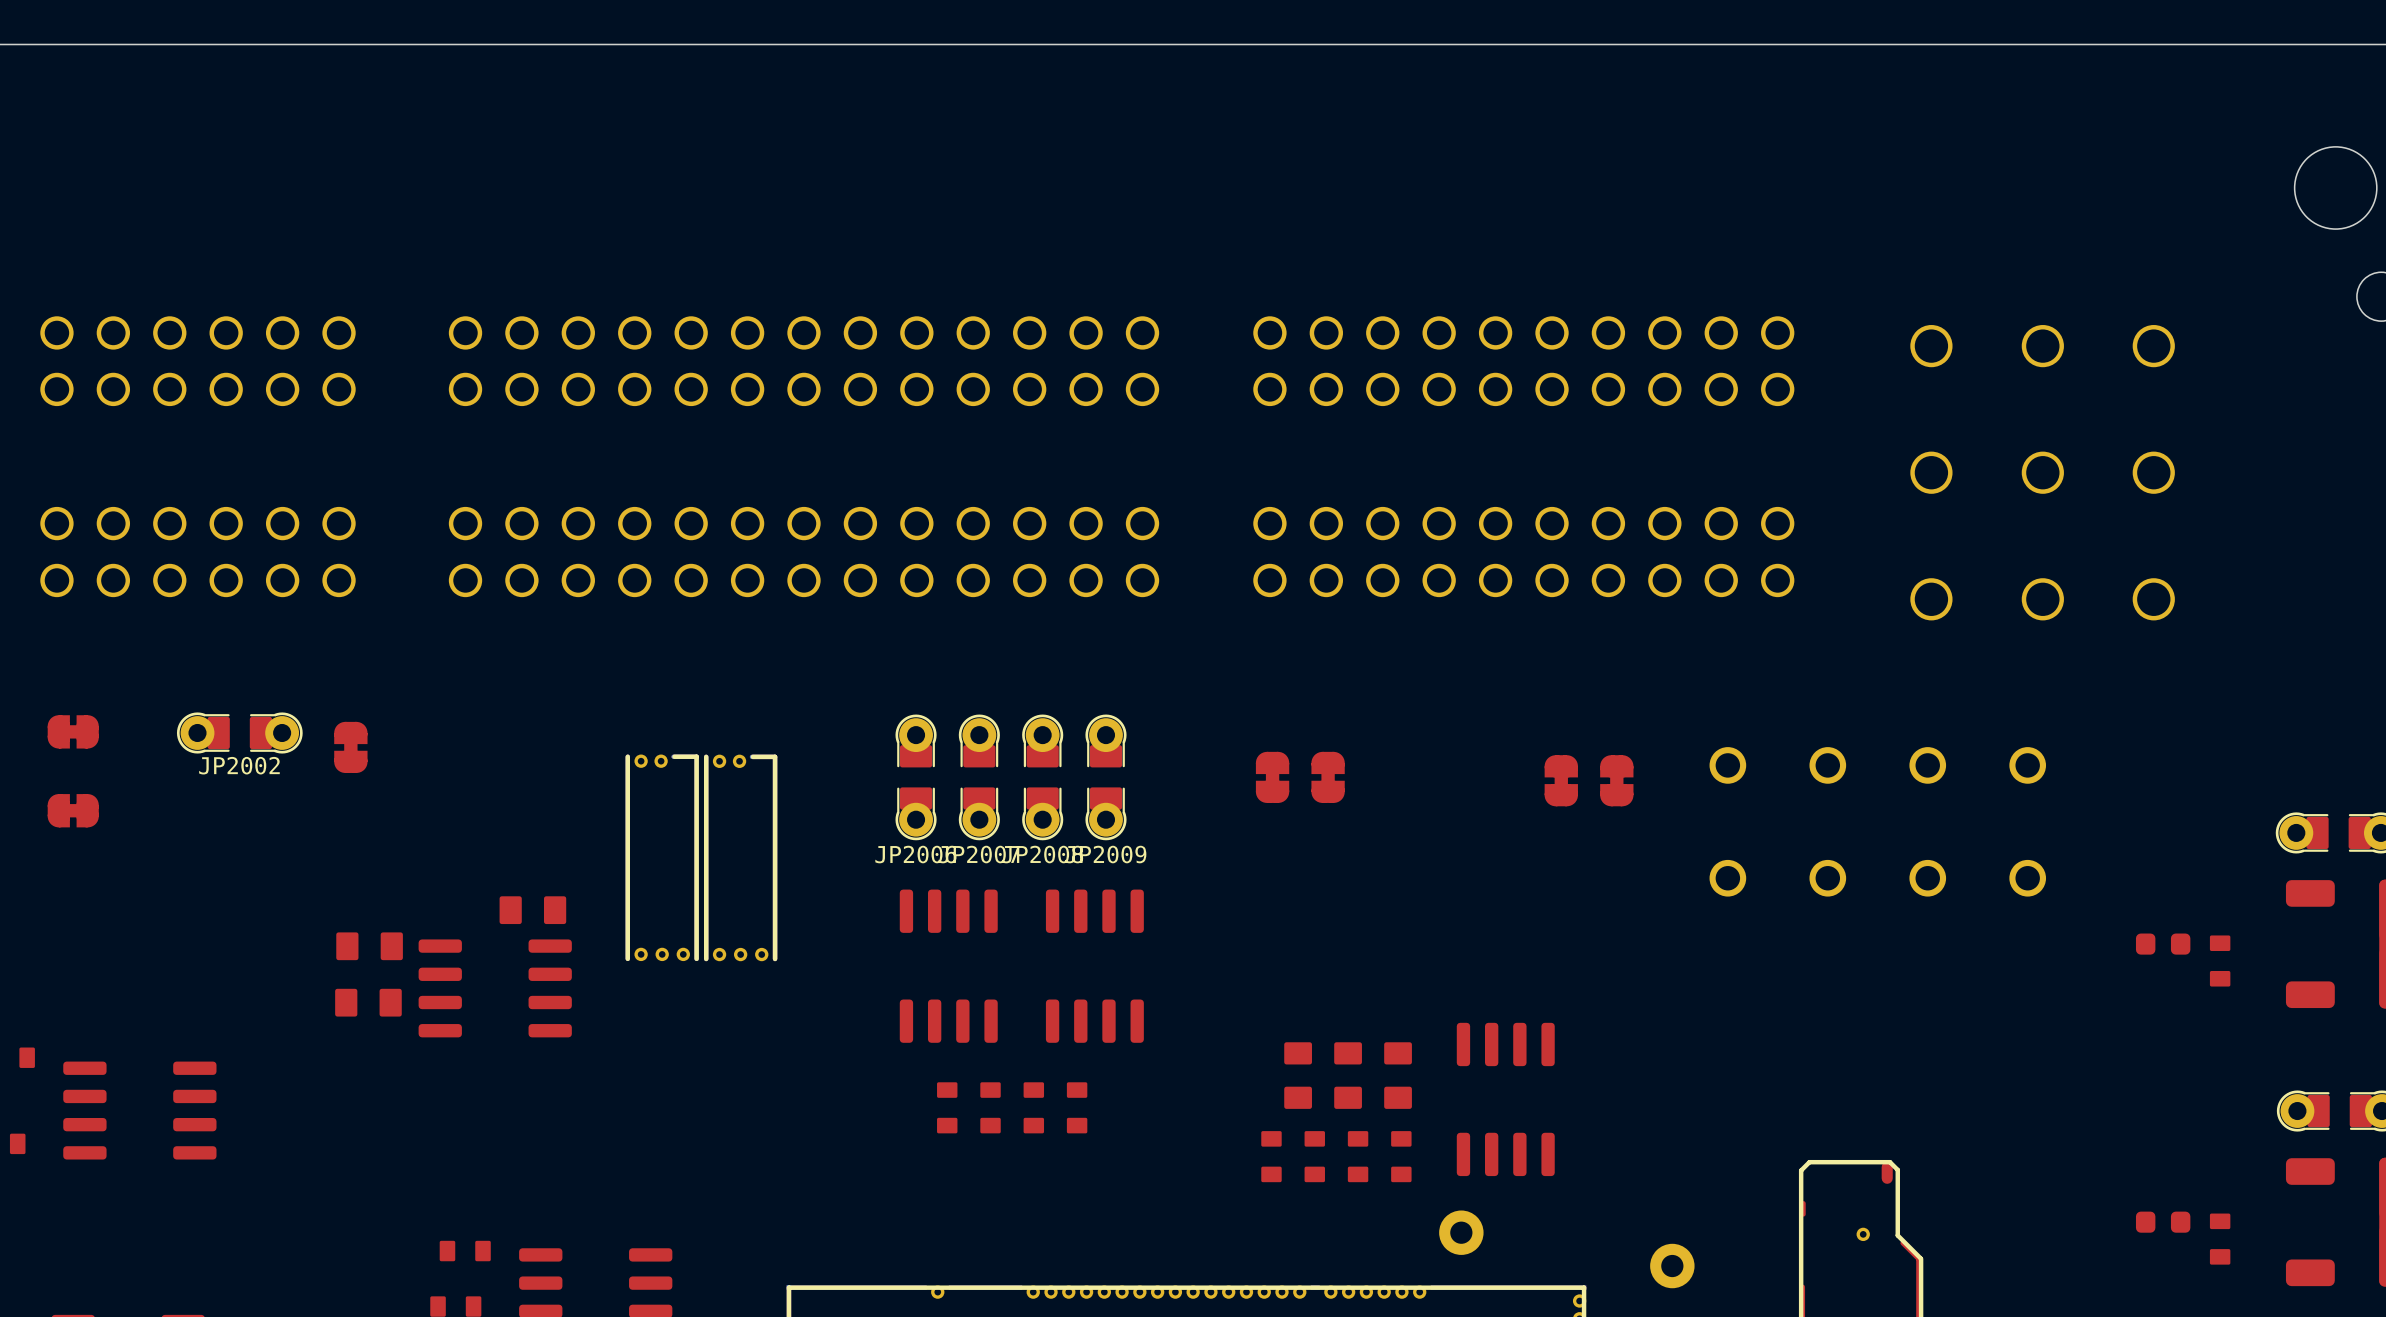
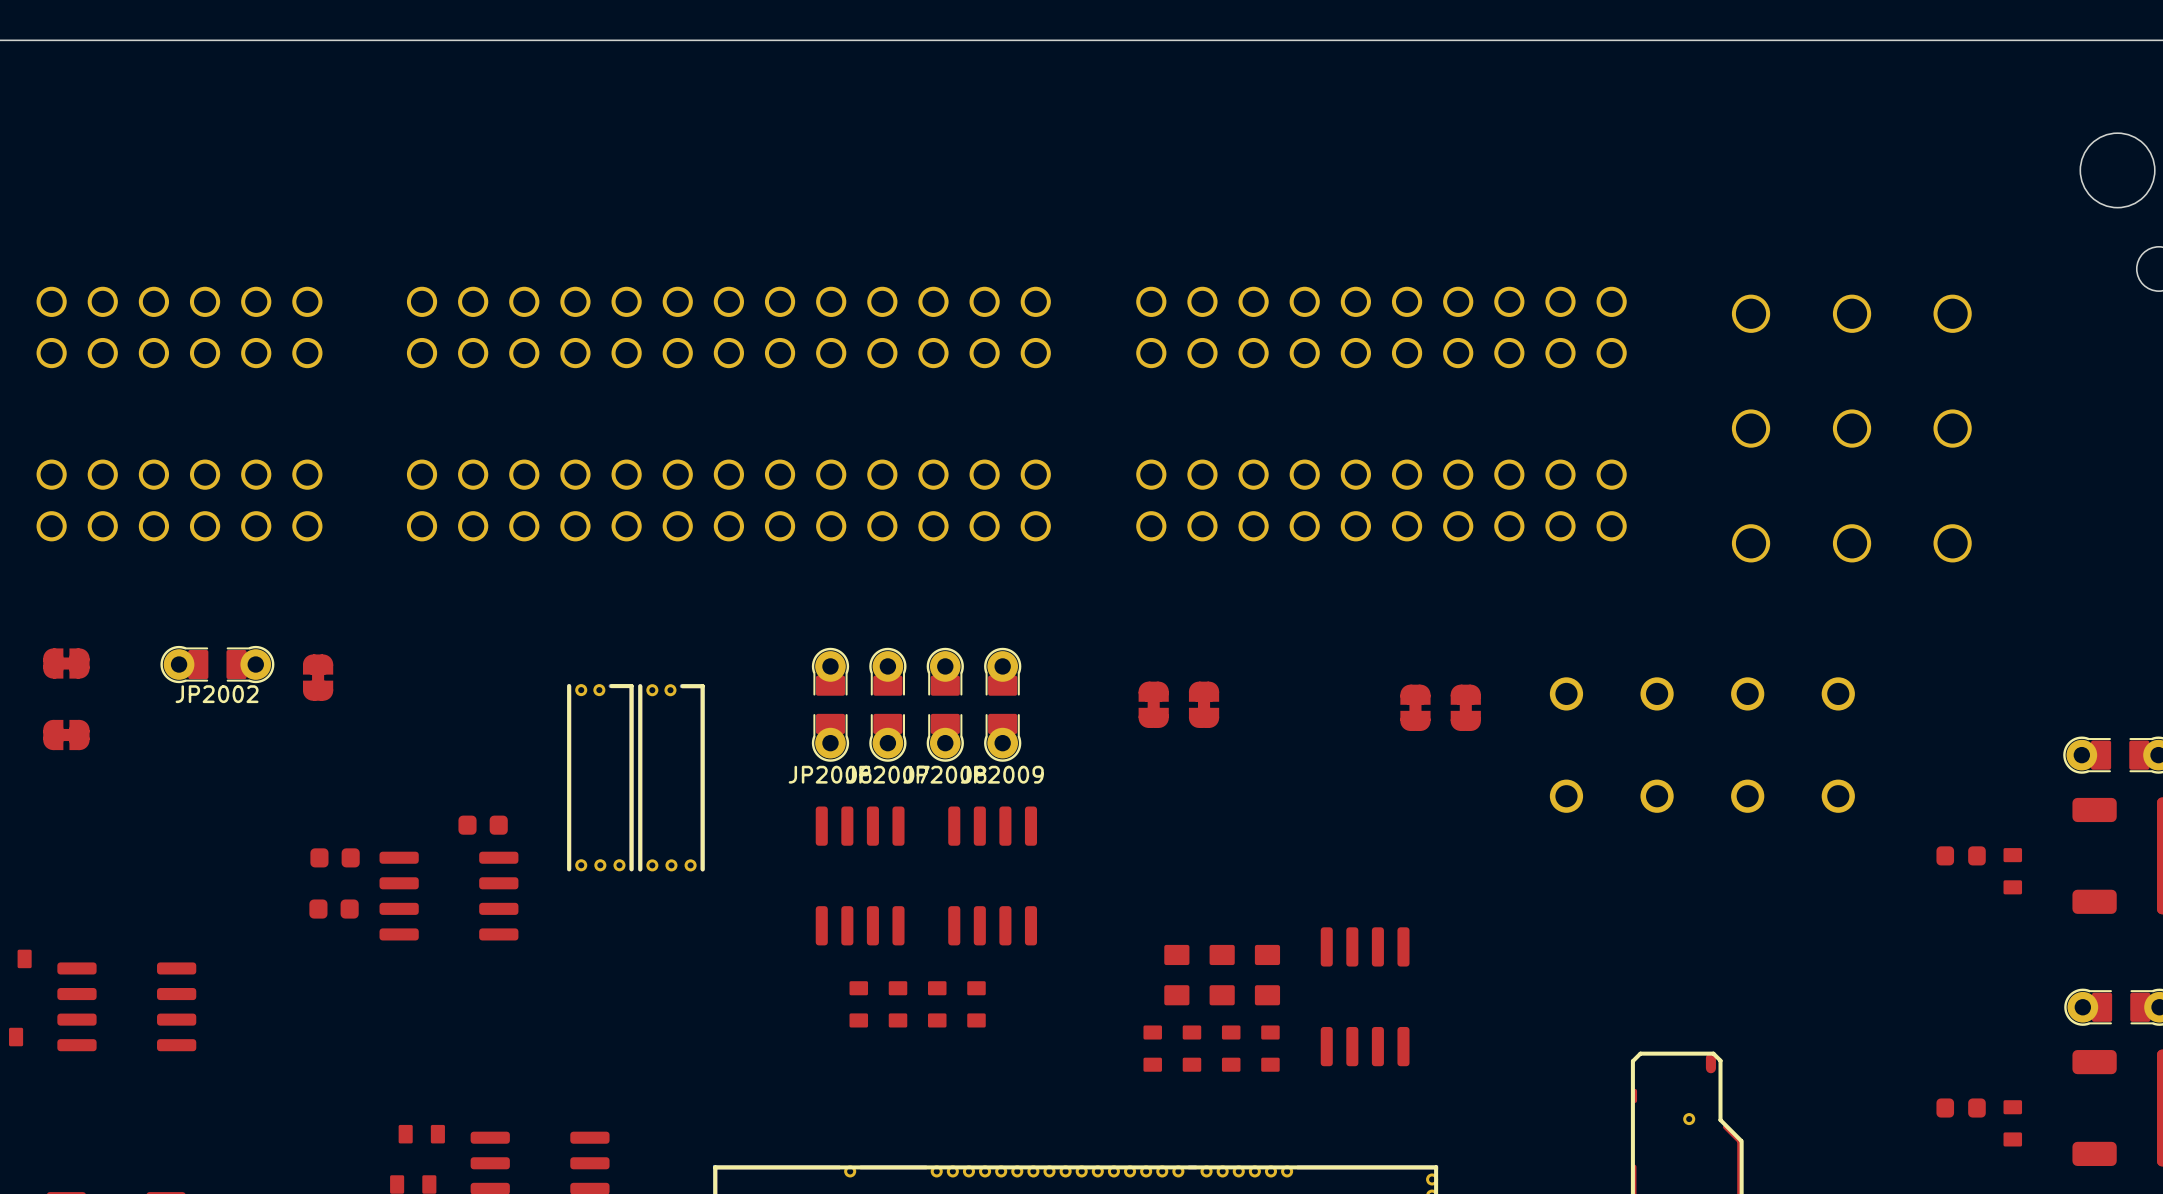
part footprint: [499, 896, 567, 925] -> [458, 815, 508, 835]
part footprint: [336, 932, 403, 961] -> [310, 848, 360, 868]
part footprint: [335, 988, 402, 1017] -> [309, 899, 359, 919]
part: (1461, 1232) -> none
part: (1672, 1266) -> none

